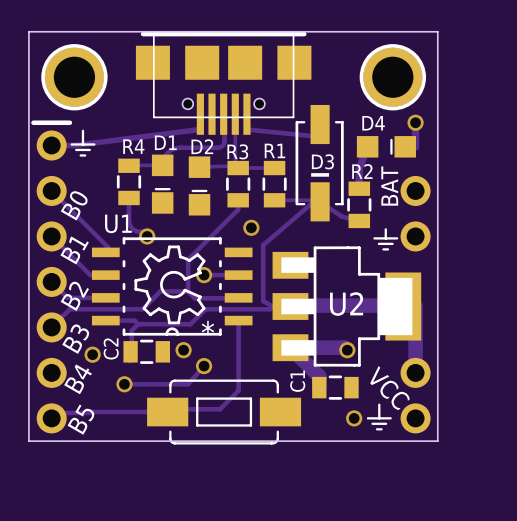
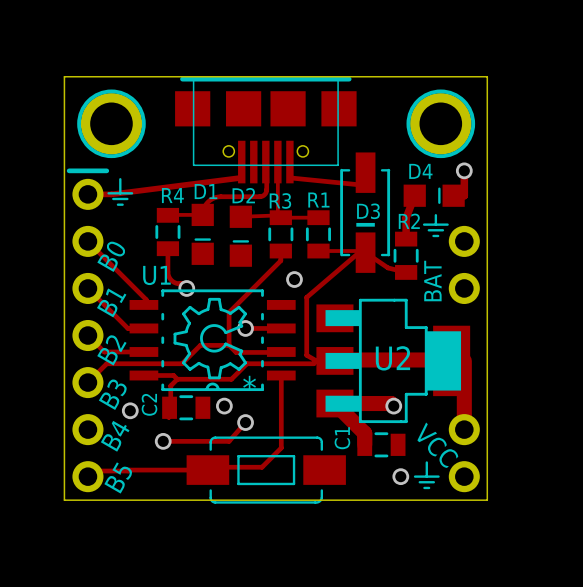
text position: BAT (389, 186) -> BAT (432, 281)
line: (385, 229) (385, 238) -> (435, 215) (435, 224)
line: (374, 238) (397, 238) -> (424, 224) (447, 224)
line: (378, 243) (392, 243) -> (428, 230) (442, 230)
line: (383, 249) (388, 249) -> (433, 235) (438, 235)

